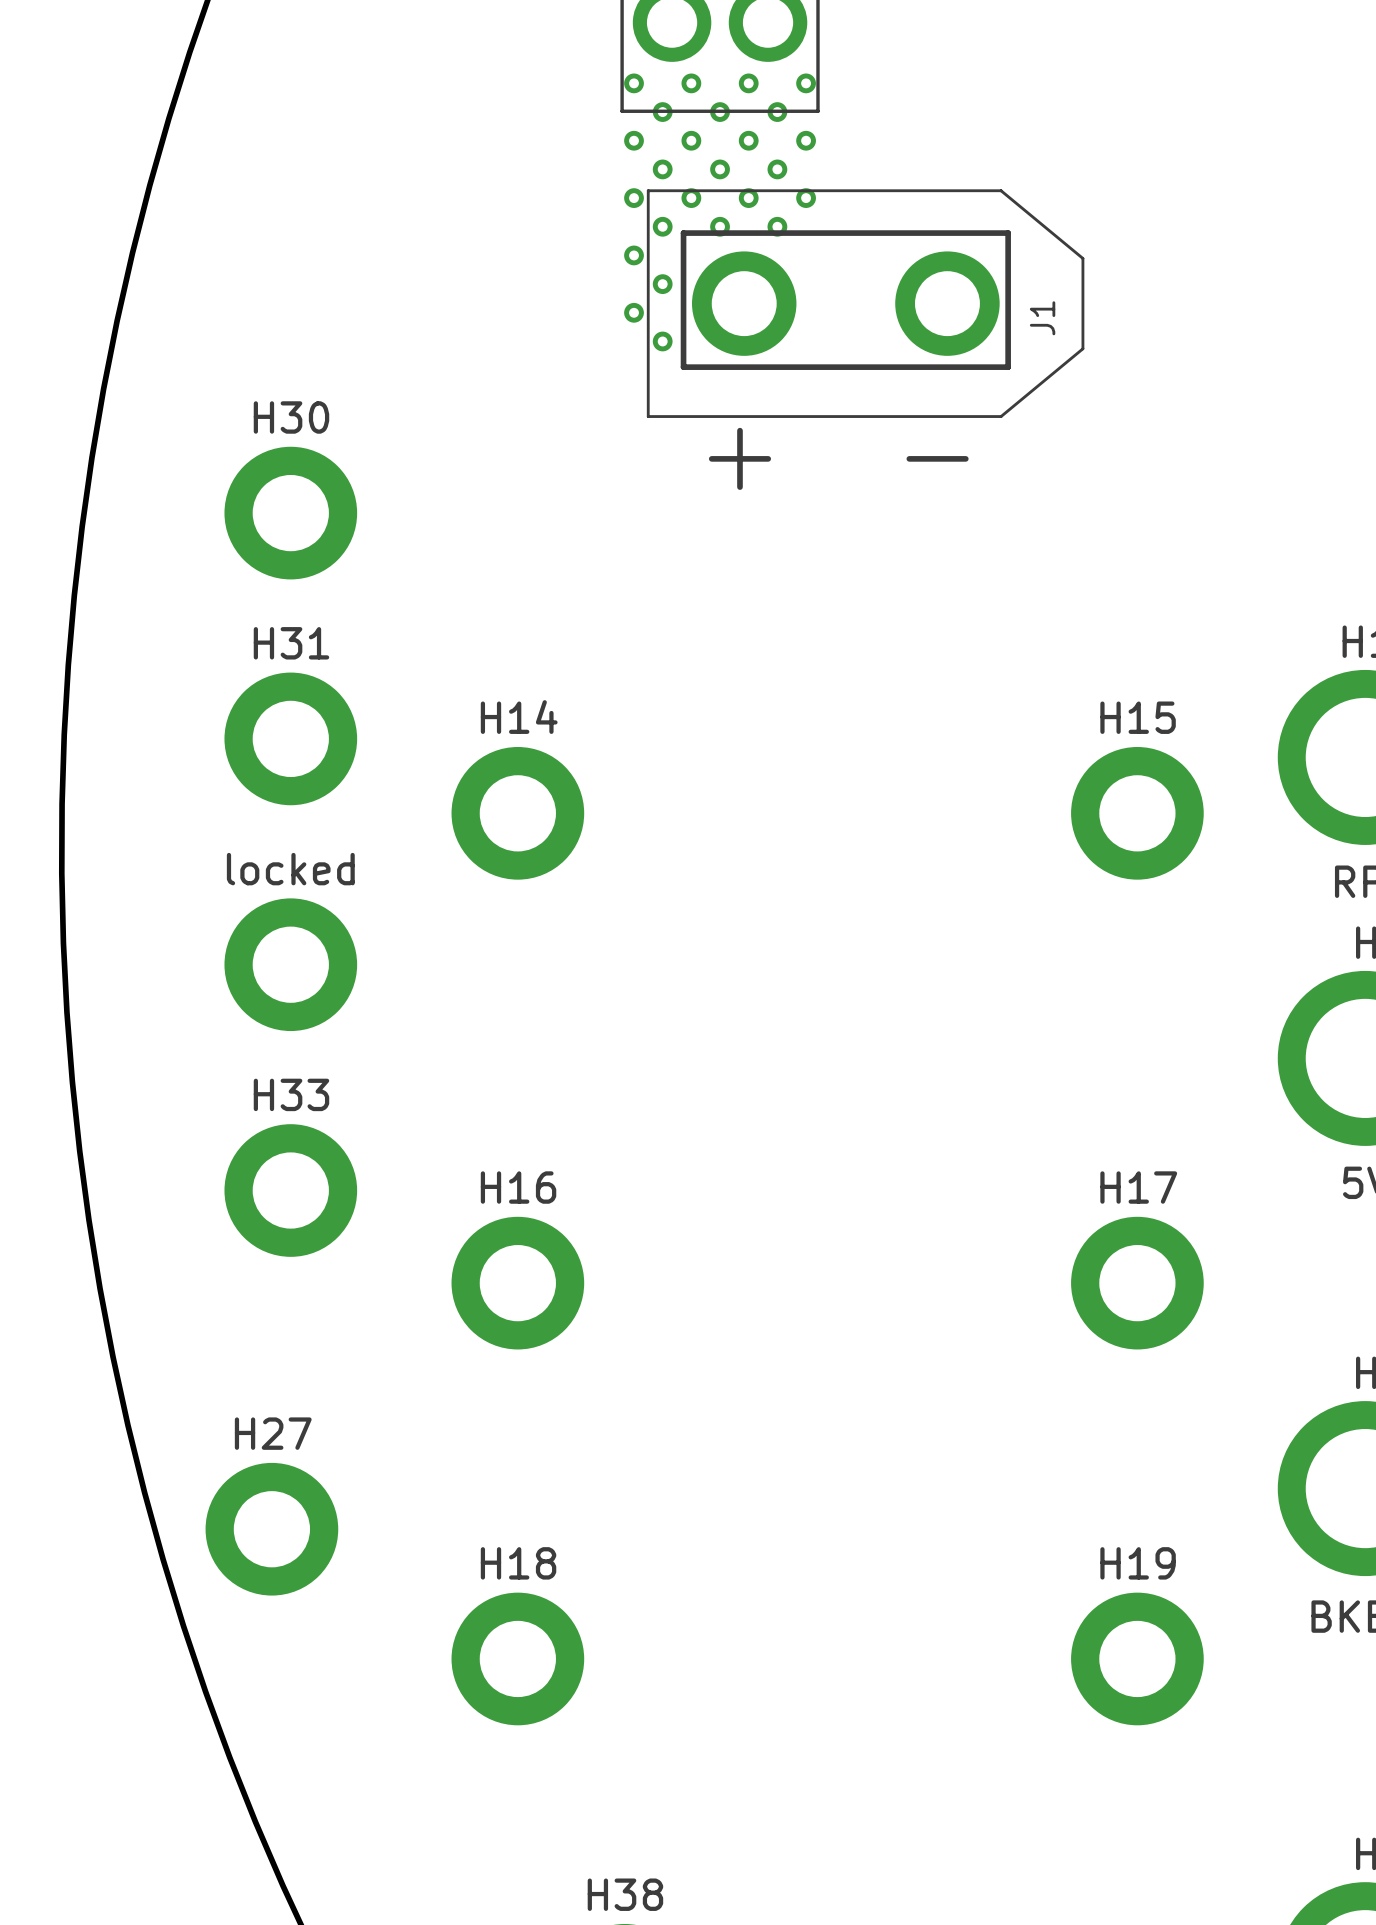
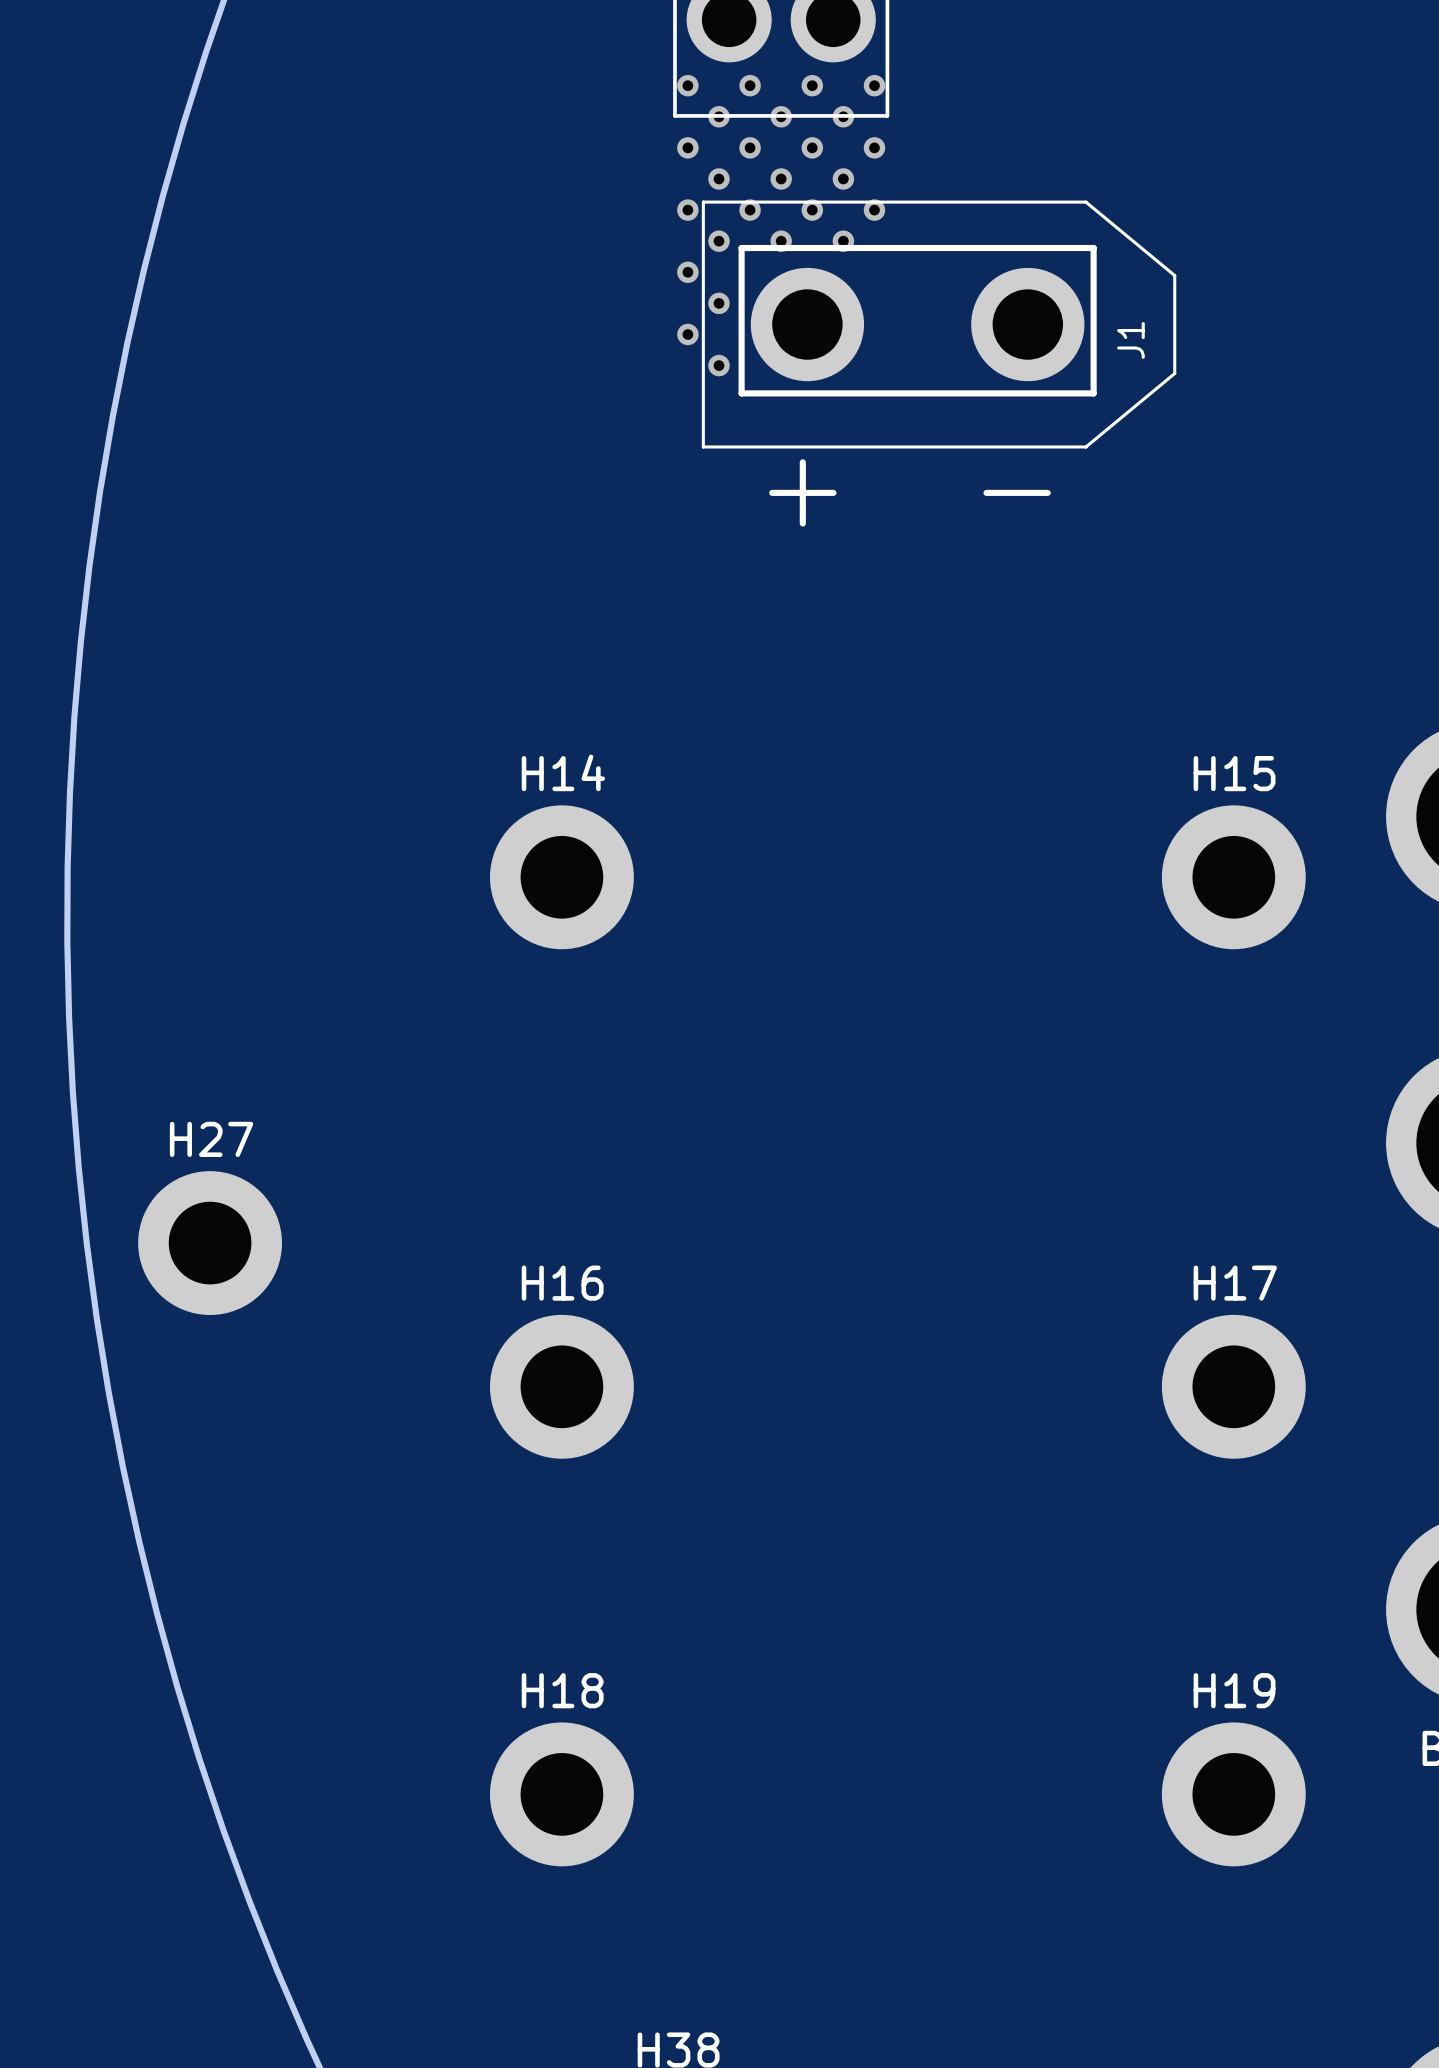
H30: (290, 513) -> none
H31: (290, 738) -> none
locked: (290, 964) -> none
H33: (290, 1190) -> none
H27 position: (271, 1529) -> (210, 1243)

